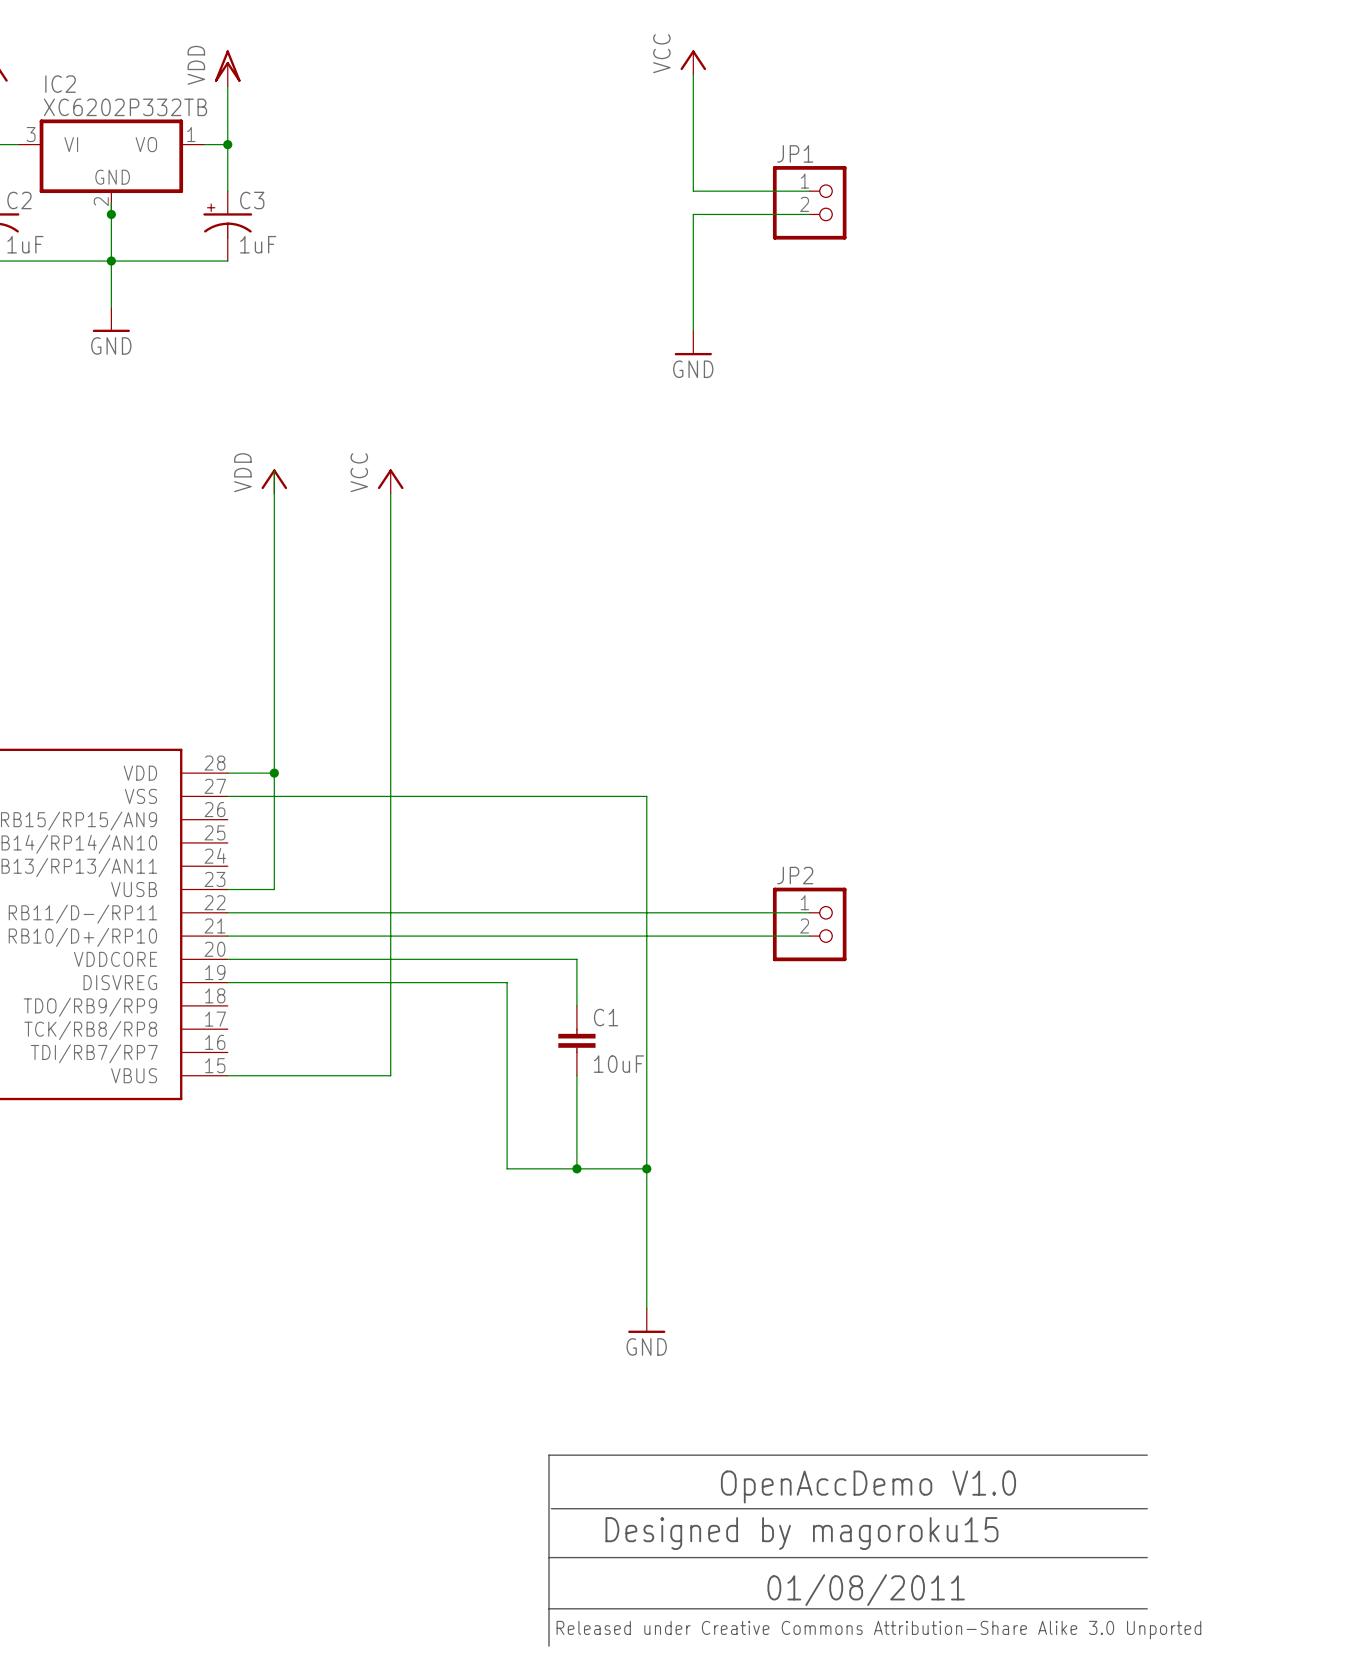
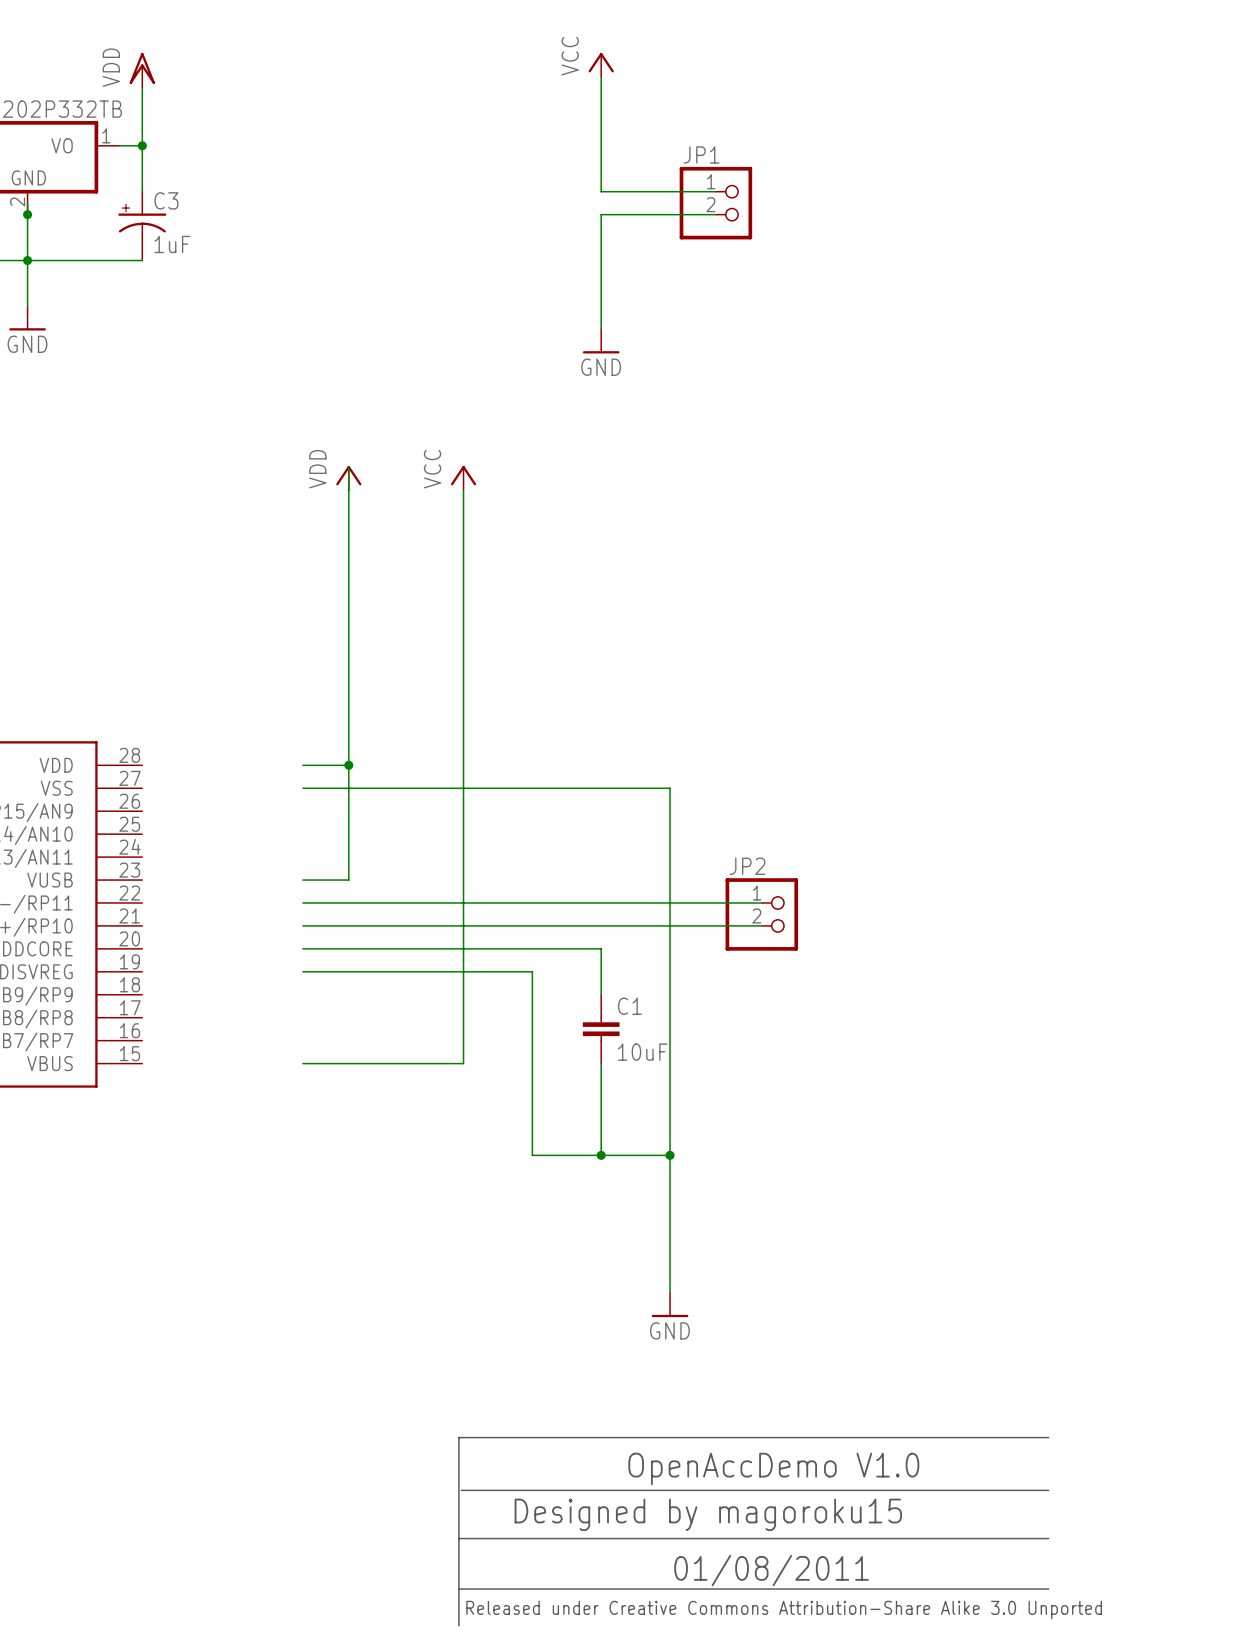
wire: (274, 470) (274, 889) (227, 889) -> (348, 467) (348, 880) (302, 880)
power symbol position: VDD (274, 481) -> VDD (348, 477)
power symbol position: VCC (390, 481) -> VCC (463, 477)
wire: (390, 493) (390, 1075) (227, 1075) -> (463, 489) (463, 1063) (302, 1063)
wire: (227, 773) (274, 773) -> (302, 765) (348, 765)
junction: (274, 773) -> none
junction: none -> (348, 765)
wire: (227, 796) (390, 796) -> none
wire: (646, 796) (646, 1308) -> (555, 788) (670, 788) (670, 1293)
wire: (227, 912) (390, 912) -> none
wire: none -> (715, 902) (761, 902)
JP2 position: (809, 924) -> (761, 914)
wire: (227, 936) (390, 936) -> none
wire: none -> (715, 925) (761, 925)
wire: (227, 959) (390, 959) -> none
wire: (576, 959) (576, 1005) -> (486, 948) (601, 948) (601, 994)
wire: (227, 982) (390, 982) -> none
wire: (507, 982) (507, 1168) (623, 1168) -> (417, 971) (532, 971) (532, 1155)
C1 position: (576, 1040) -> (601, 1029)
wire: (576, 1075) (576, 1168) -> (601, 1063) (601, 1155)
junction: (576, 1168) -> none
wire: none -> (555, 1155) (670, 1155)
junction position: (646, 1168) -> (601, 1155)
junction: none -> (670, 1155)
power symbol position: GND (646, 1320) -> GND (670, 1305)

